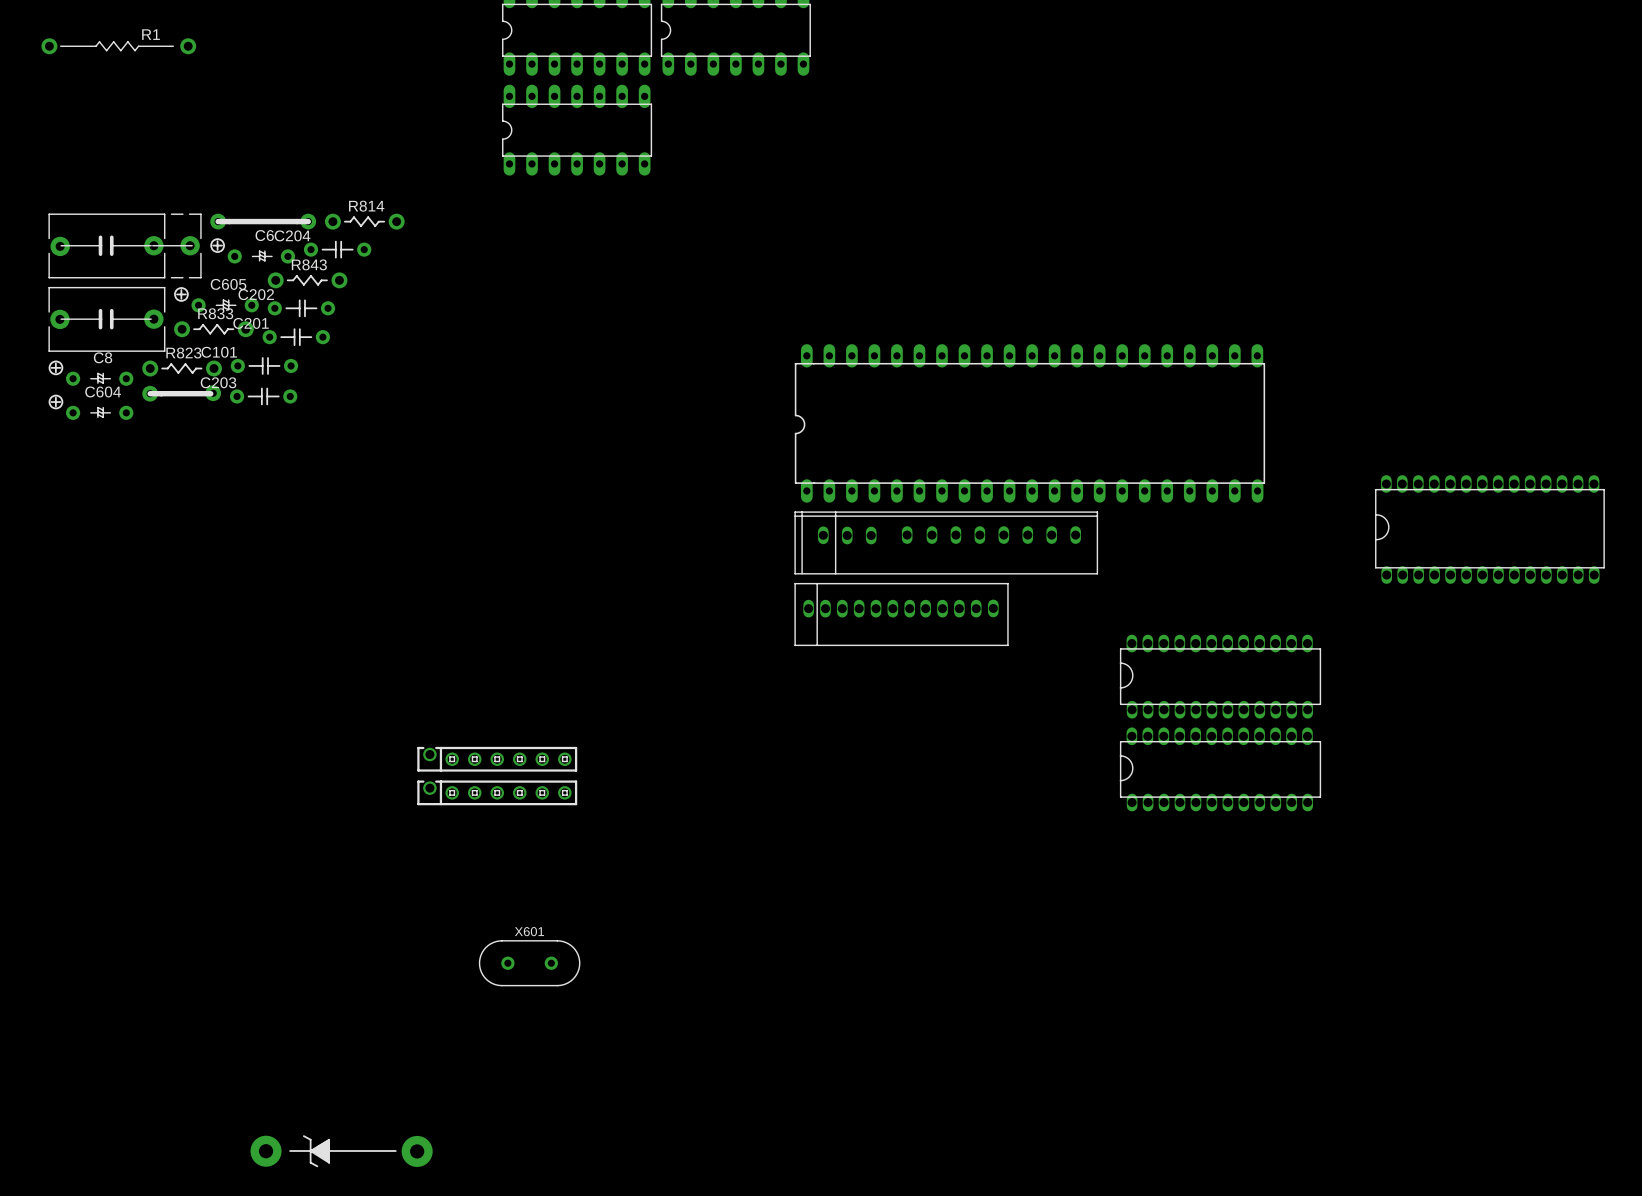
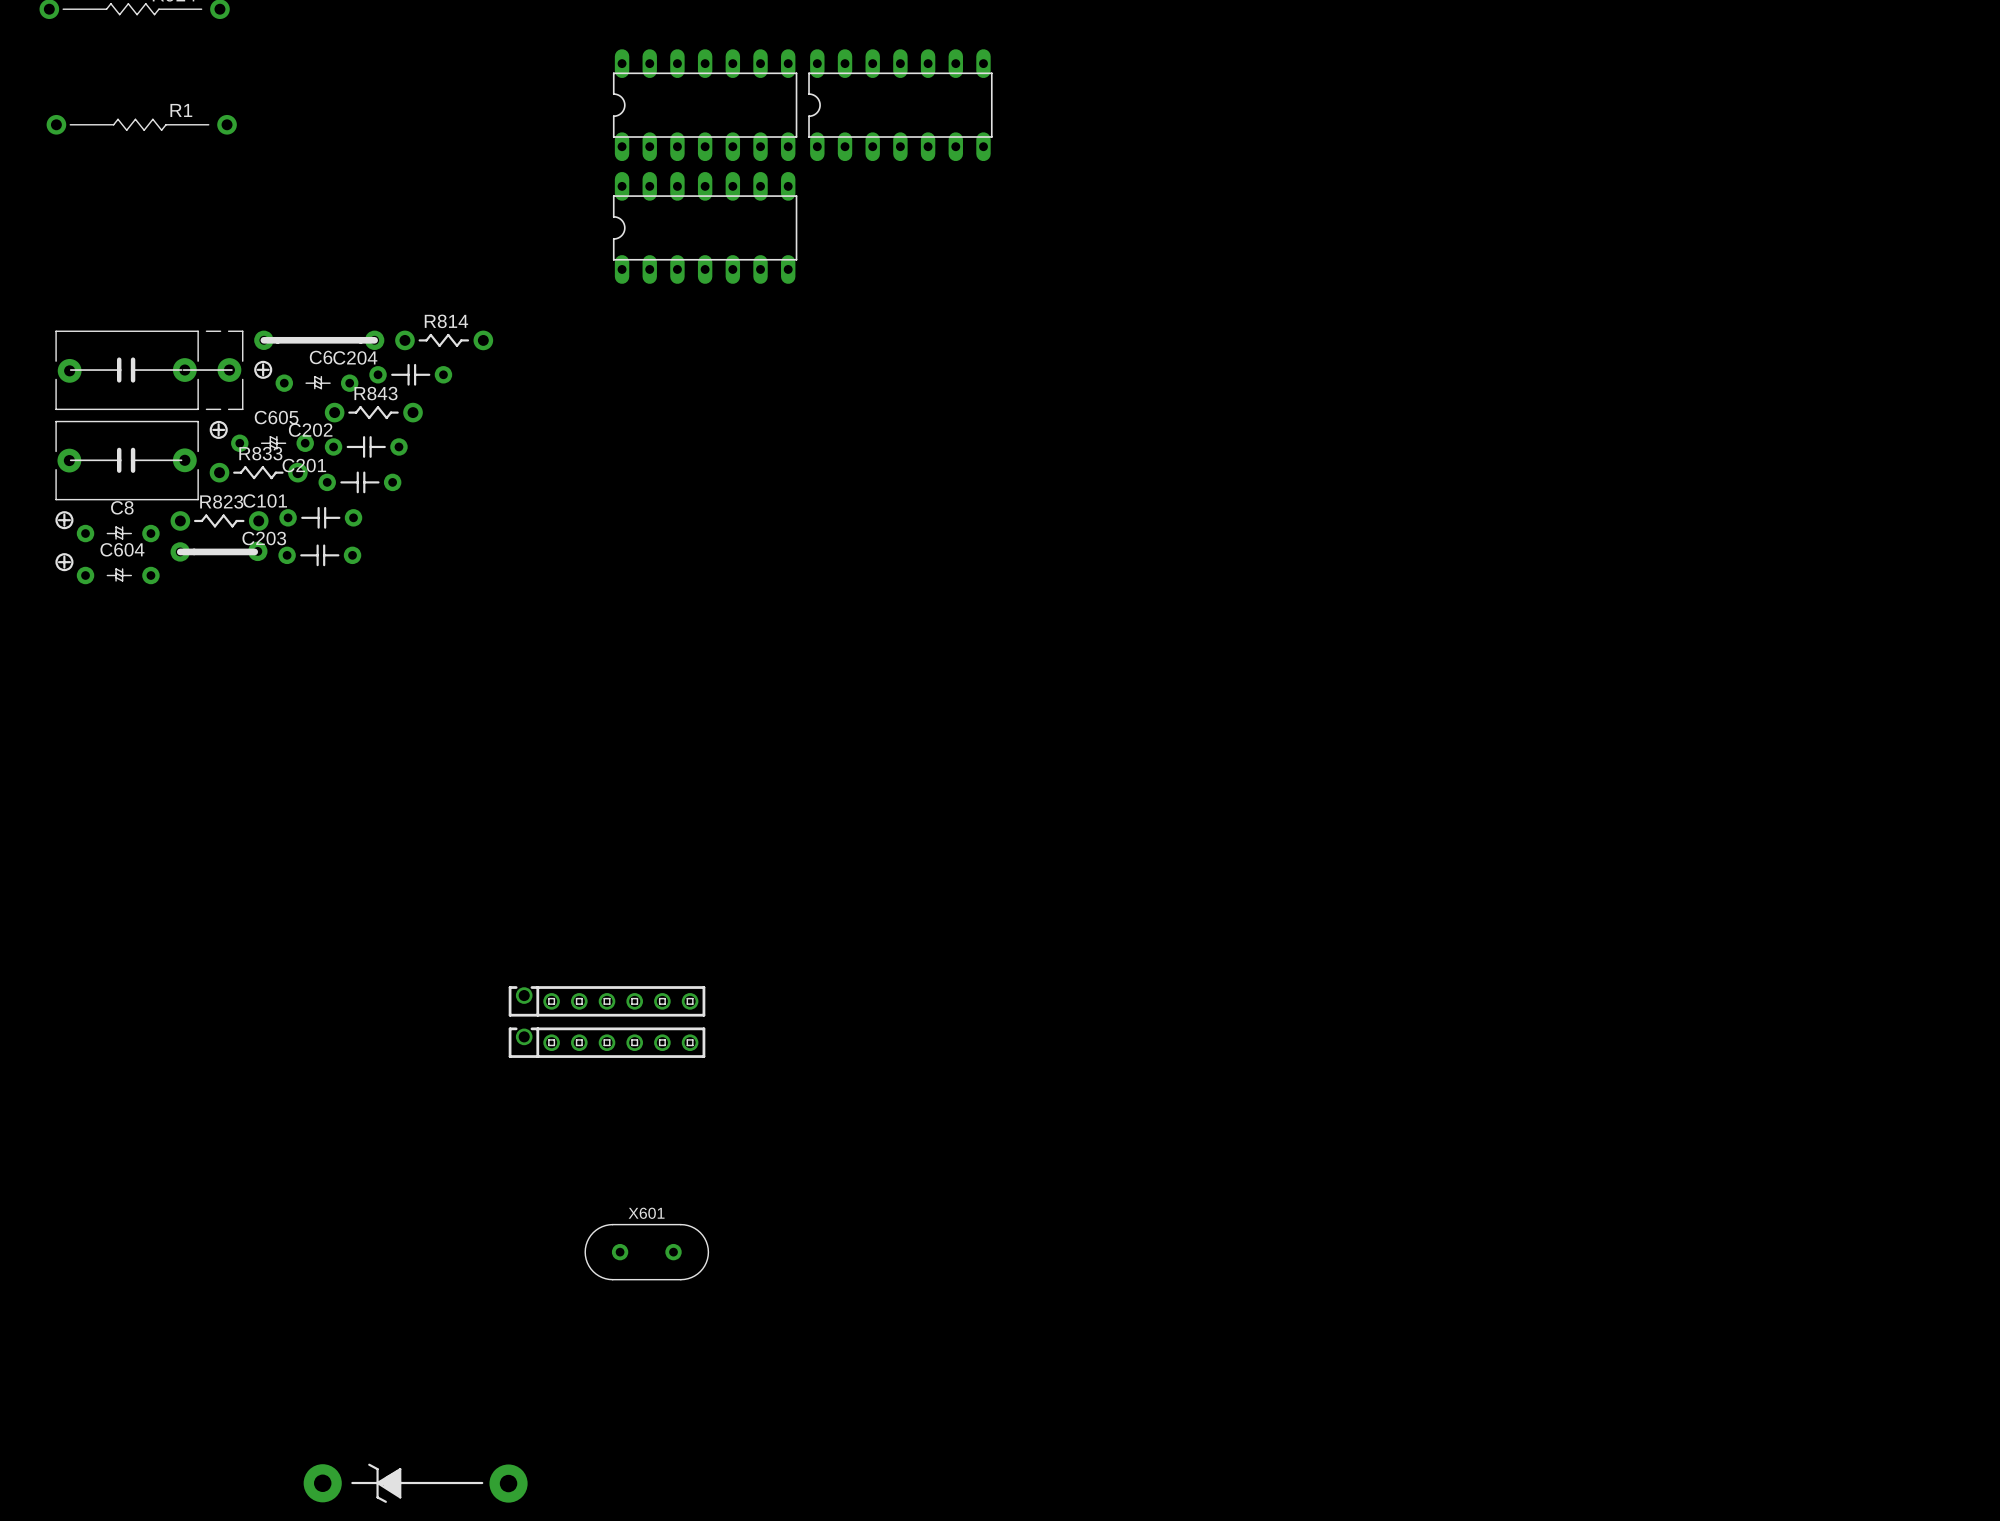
part: (1029, 423) -> none
part: (1489, 529) -> none
part: (946, 542) -> none
part: (901, 614) -> none
part: (1220, 676) -> none
part: (1220, 769) -> none

